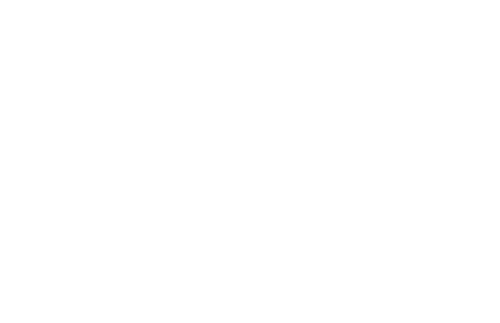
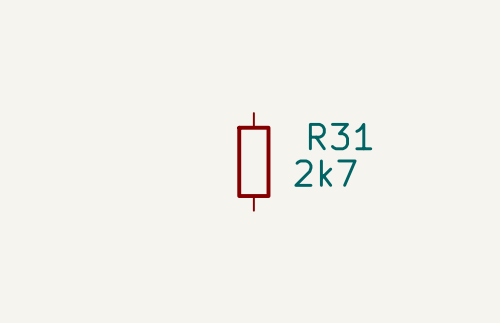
R31: none -> 2k7 (253, 161)

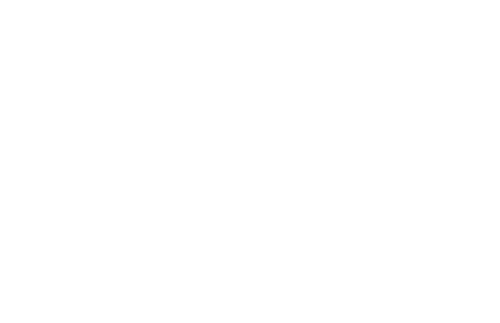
R31: 2k7 (253, 161) -> none

